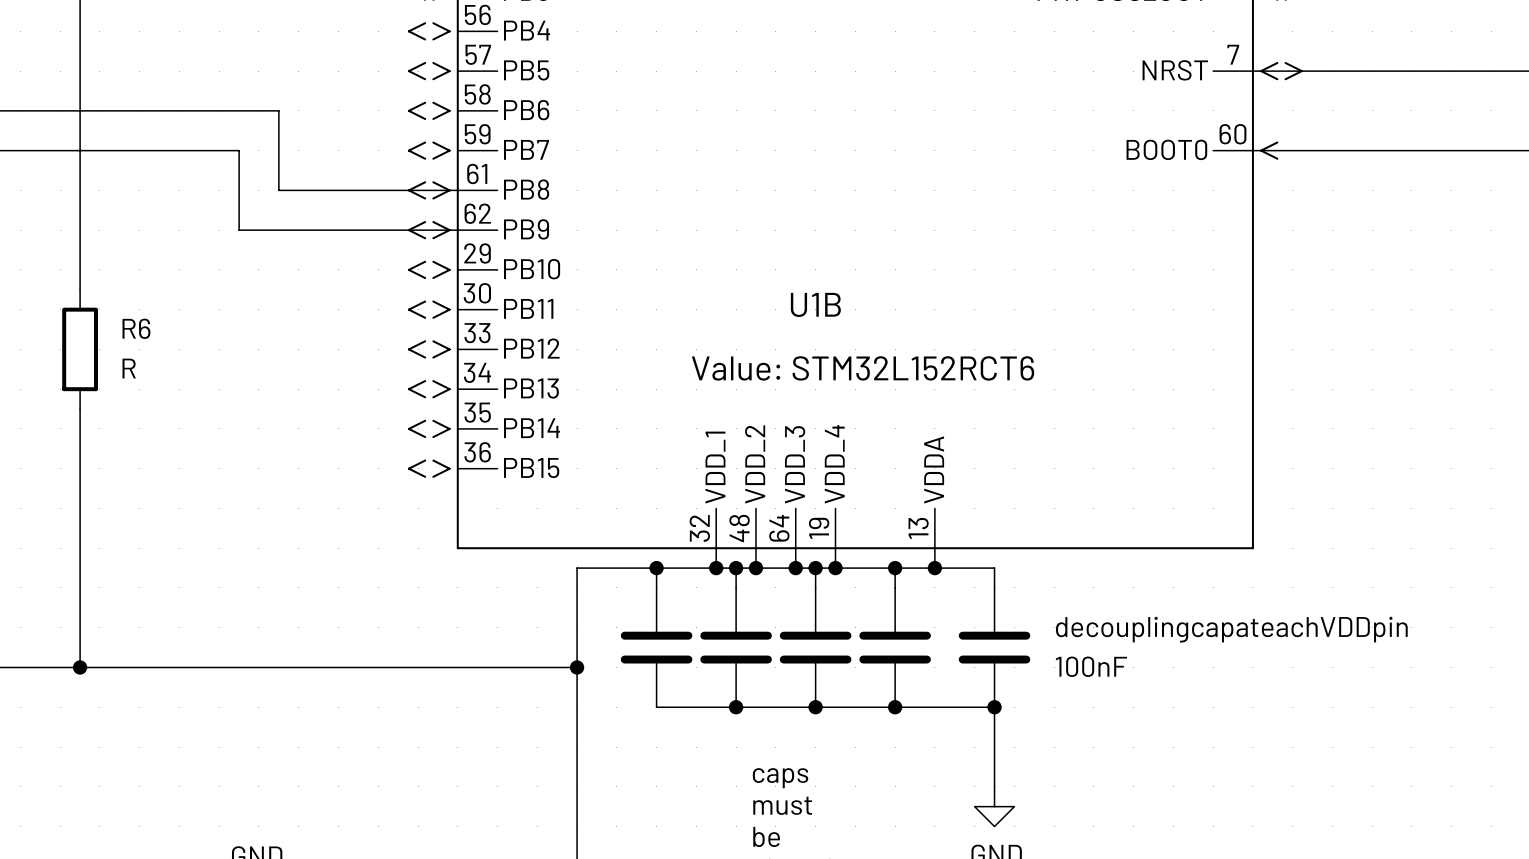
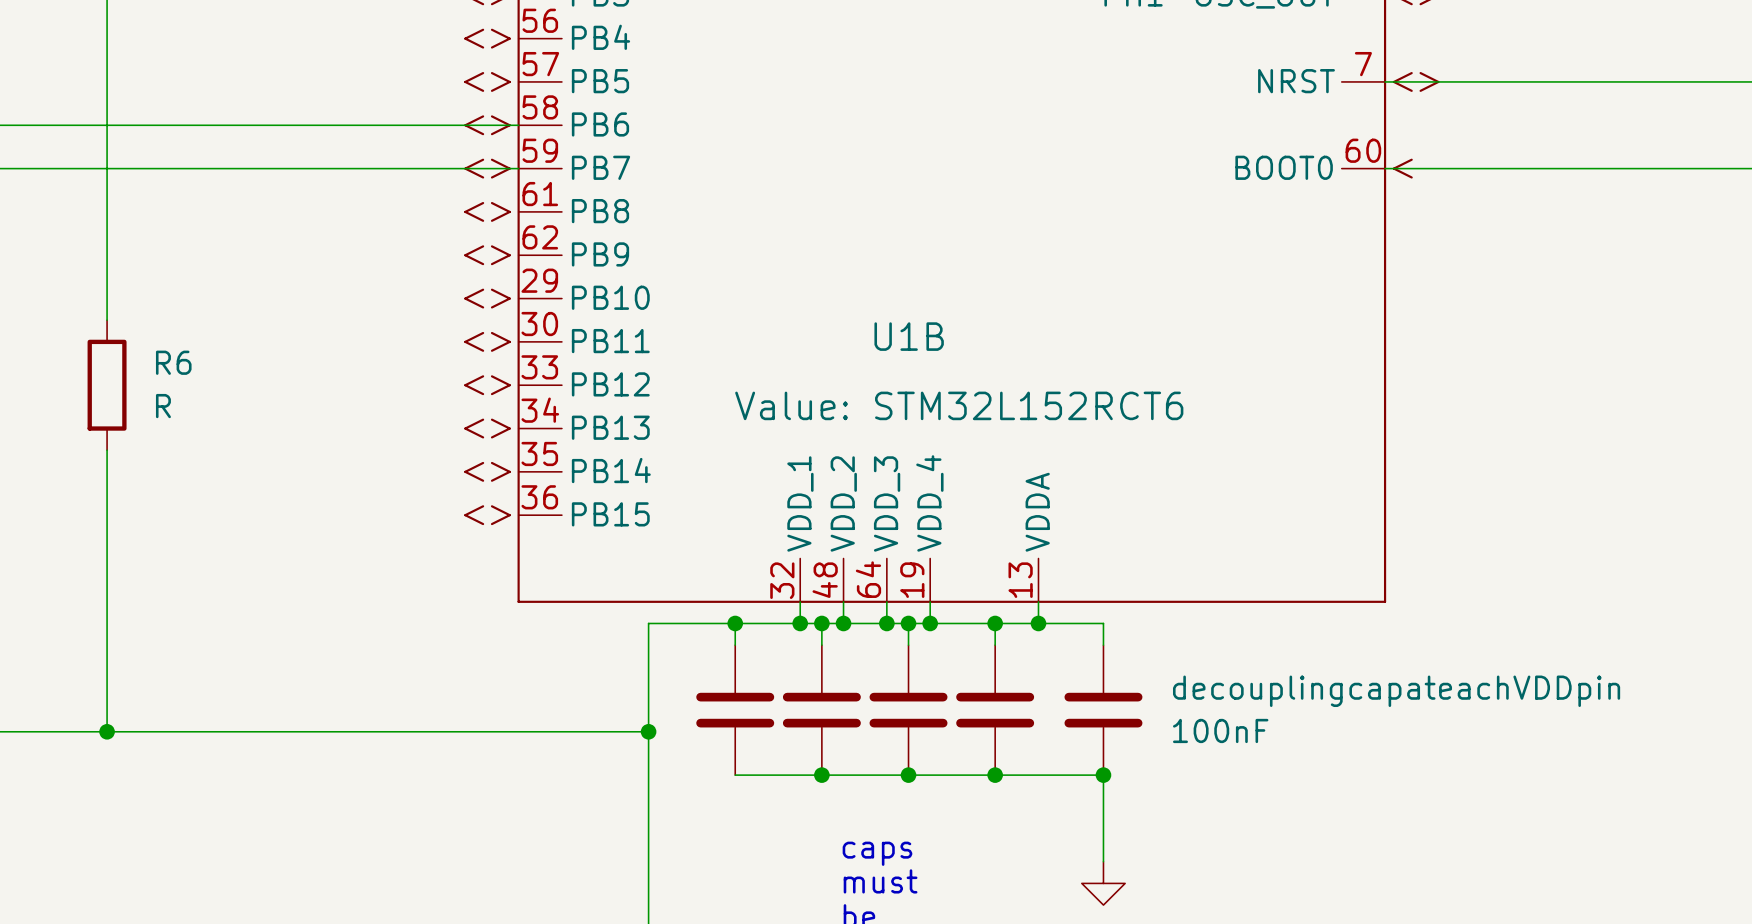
wire: (278, 110) (278, 190) (457, 190) -> (323, 125) (518, 125)
wire: (239, 150) (239, 230) (457, 230) -> (280, 168) (518, 168)

